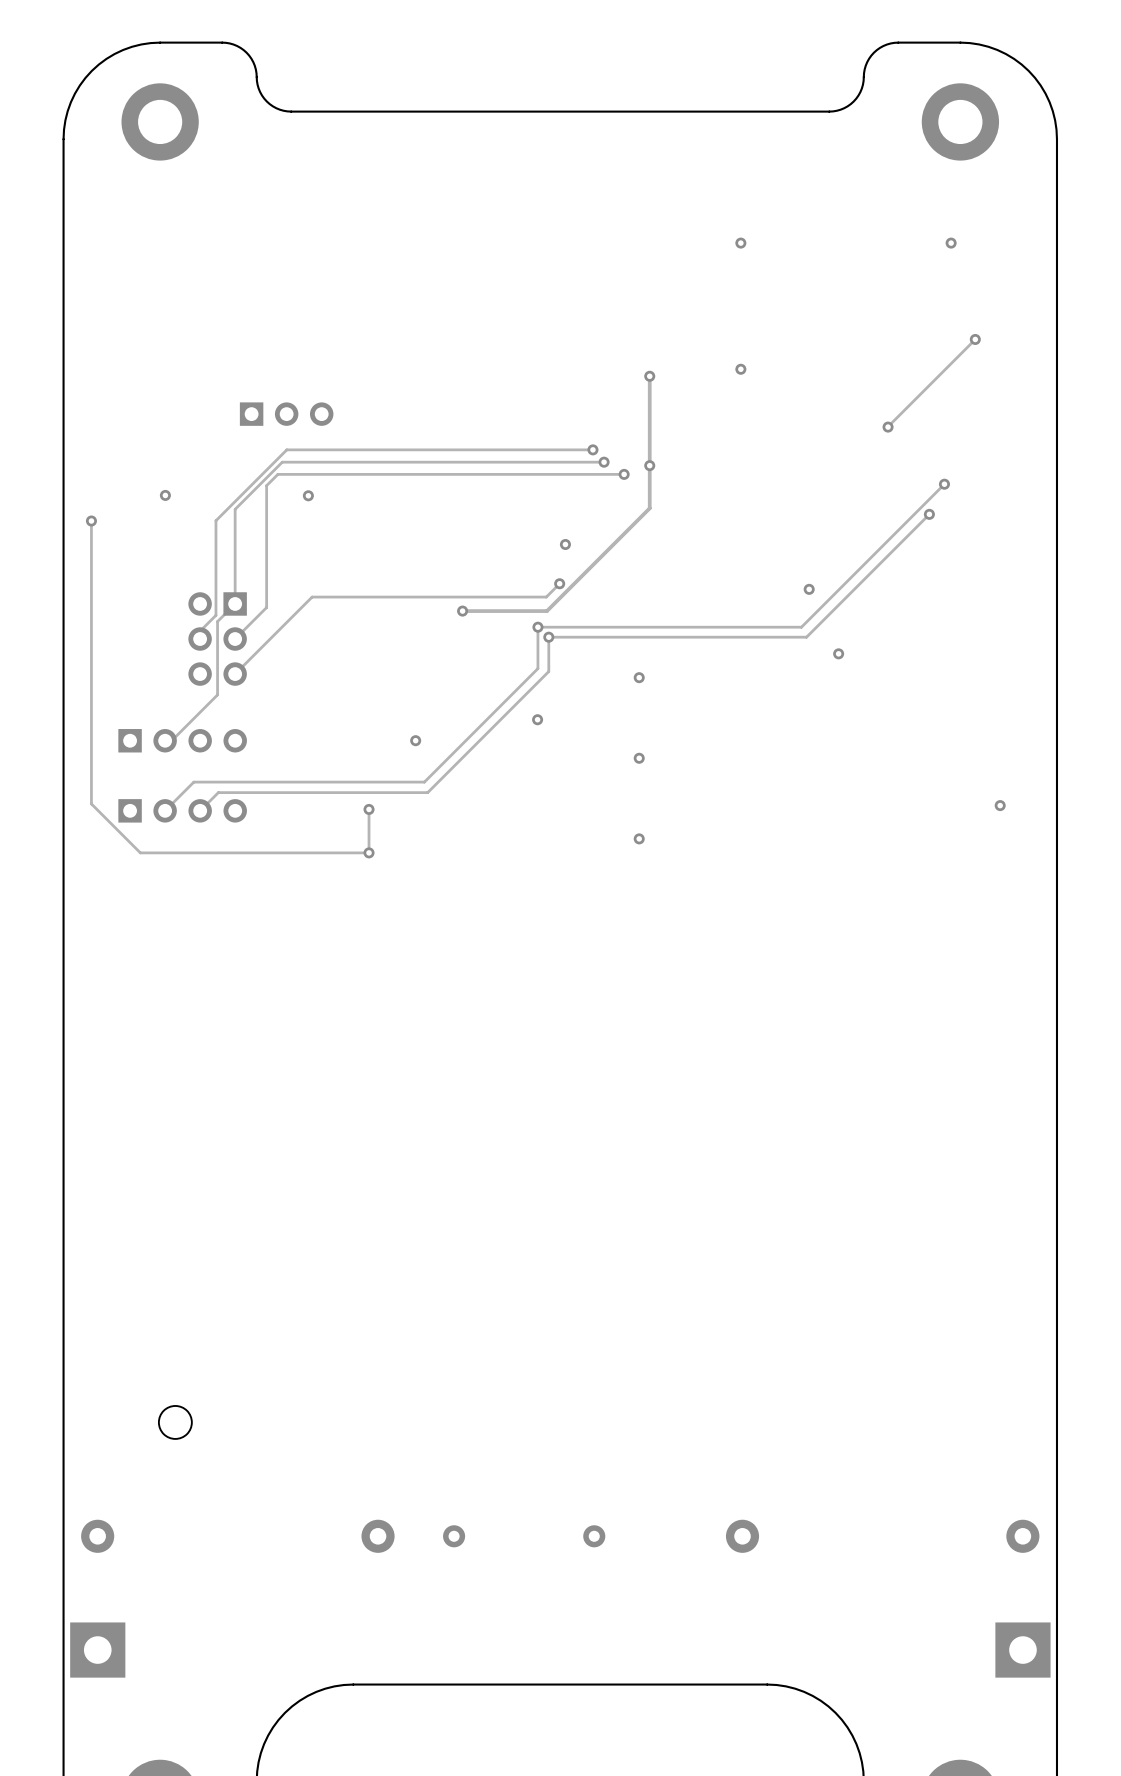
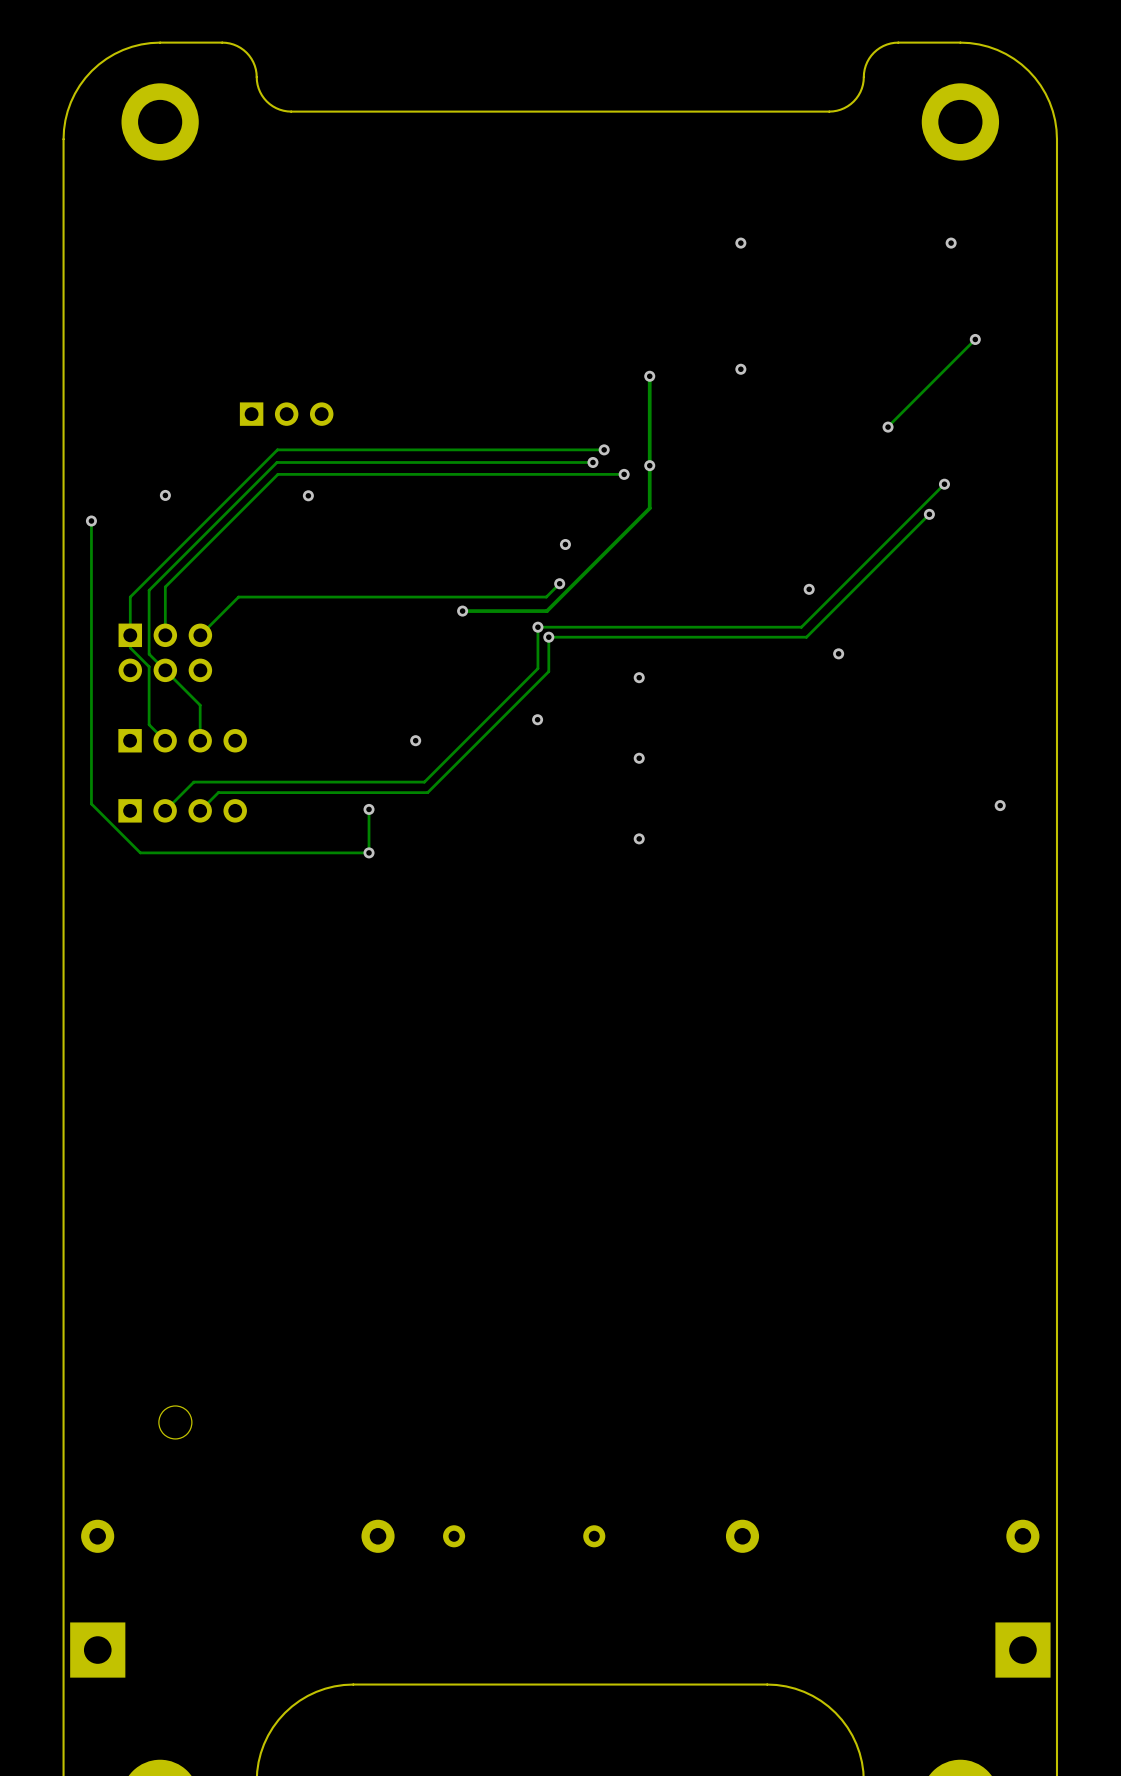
track: (286, 449) (215, 520) (215, 615) (200, 631) (200, 639) -> (286, 449) (277, 449) (130, 597) (130, 647) (149, 666) (149, 724) (165, 740)
via: (592, 449) -> none
track: none -> (604, 449) (592, 449)
via: none -> (604, 449)
track: none -> (592, 462) (276, 462) (149, 590) (149, 654) (200, 705) (200, 740)
via: none -> (592, 462)
track: (604, 462) (282, 462) (235, 509) (235, 603) (217, 621) (217, 694) (171, 740) (165, 740) -> none
via: (604, 462) -> none
track: (266, 485) (266, 607) (235, 639) -> (266, 485) (165, 586) (165, 635)
track: (312, 597) (235, 674) -> (312, 597) (238, 597) (200, 635)
part rotation: 0° (217, 639) -> 90° counterclockwise (165, 652)

